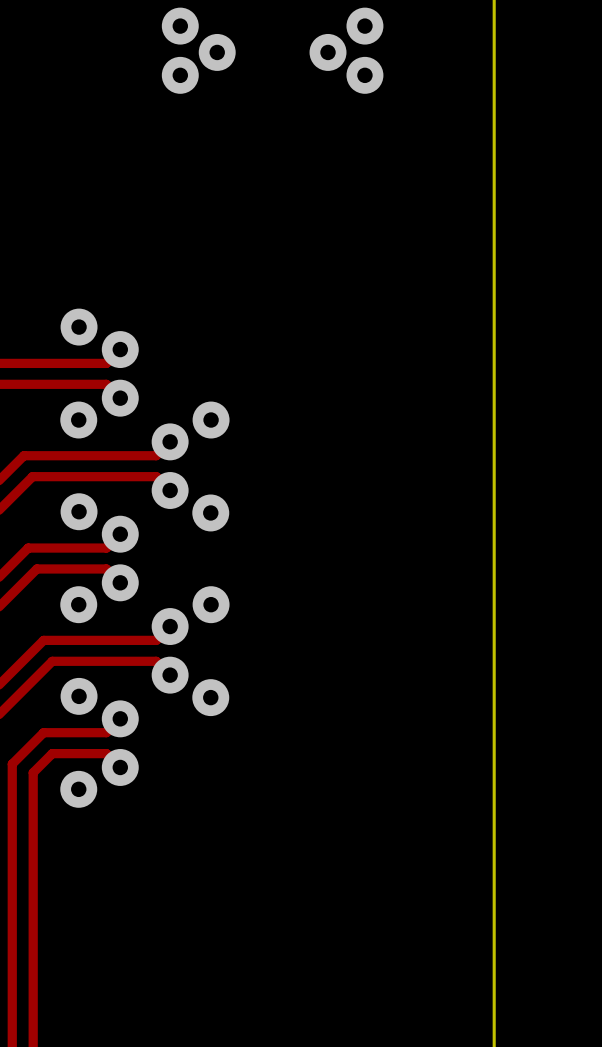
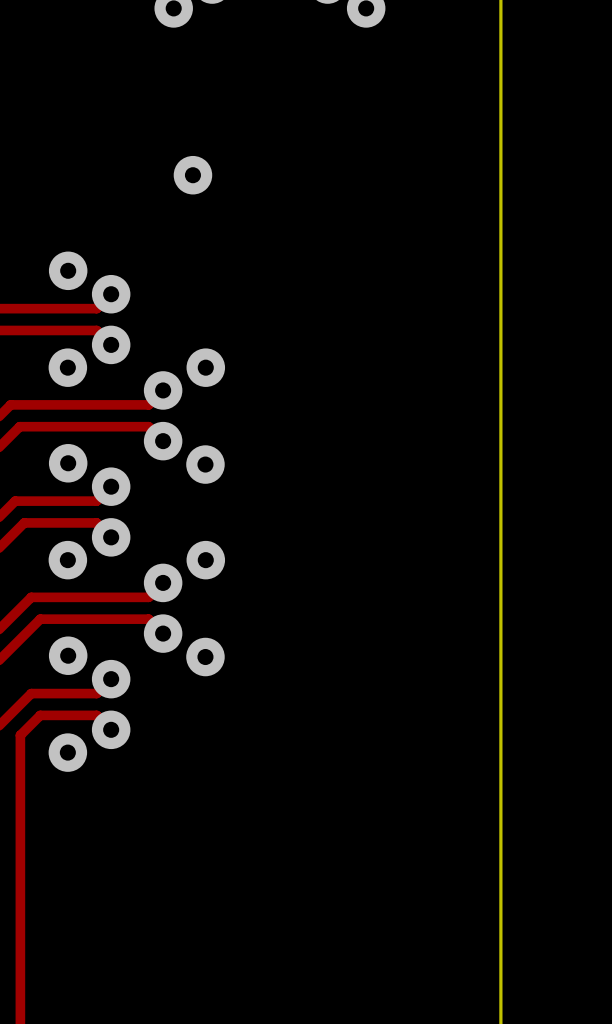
via: none -> (192, 175)

